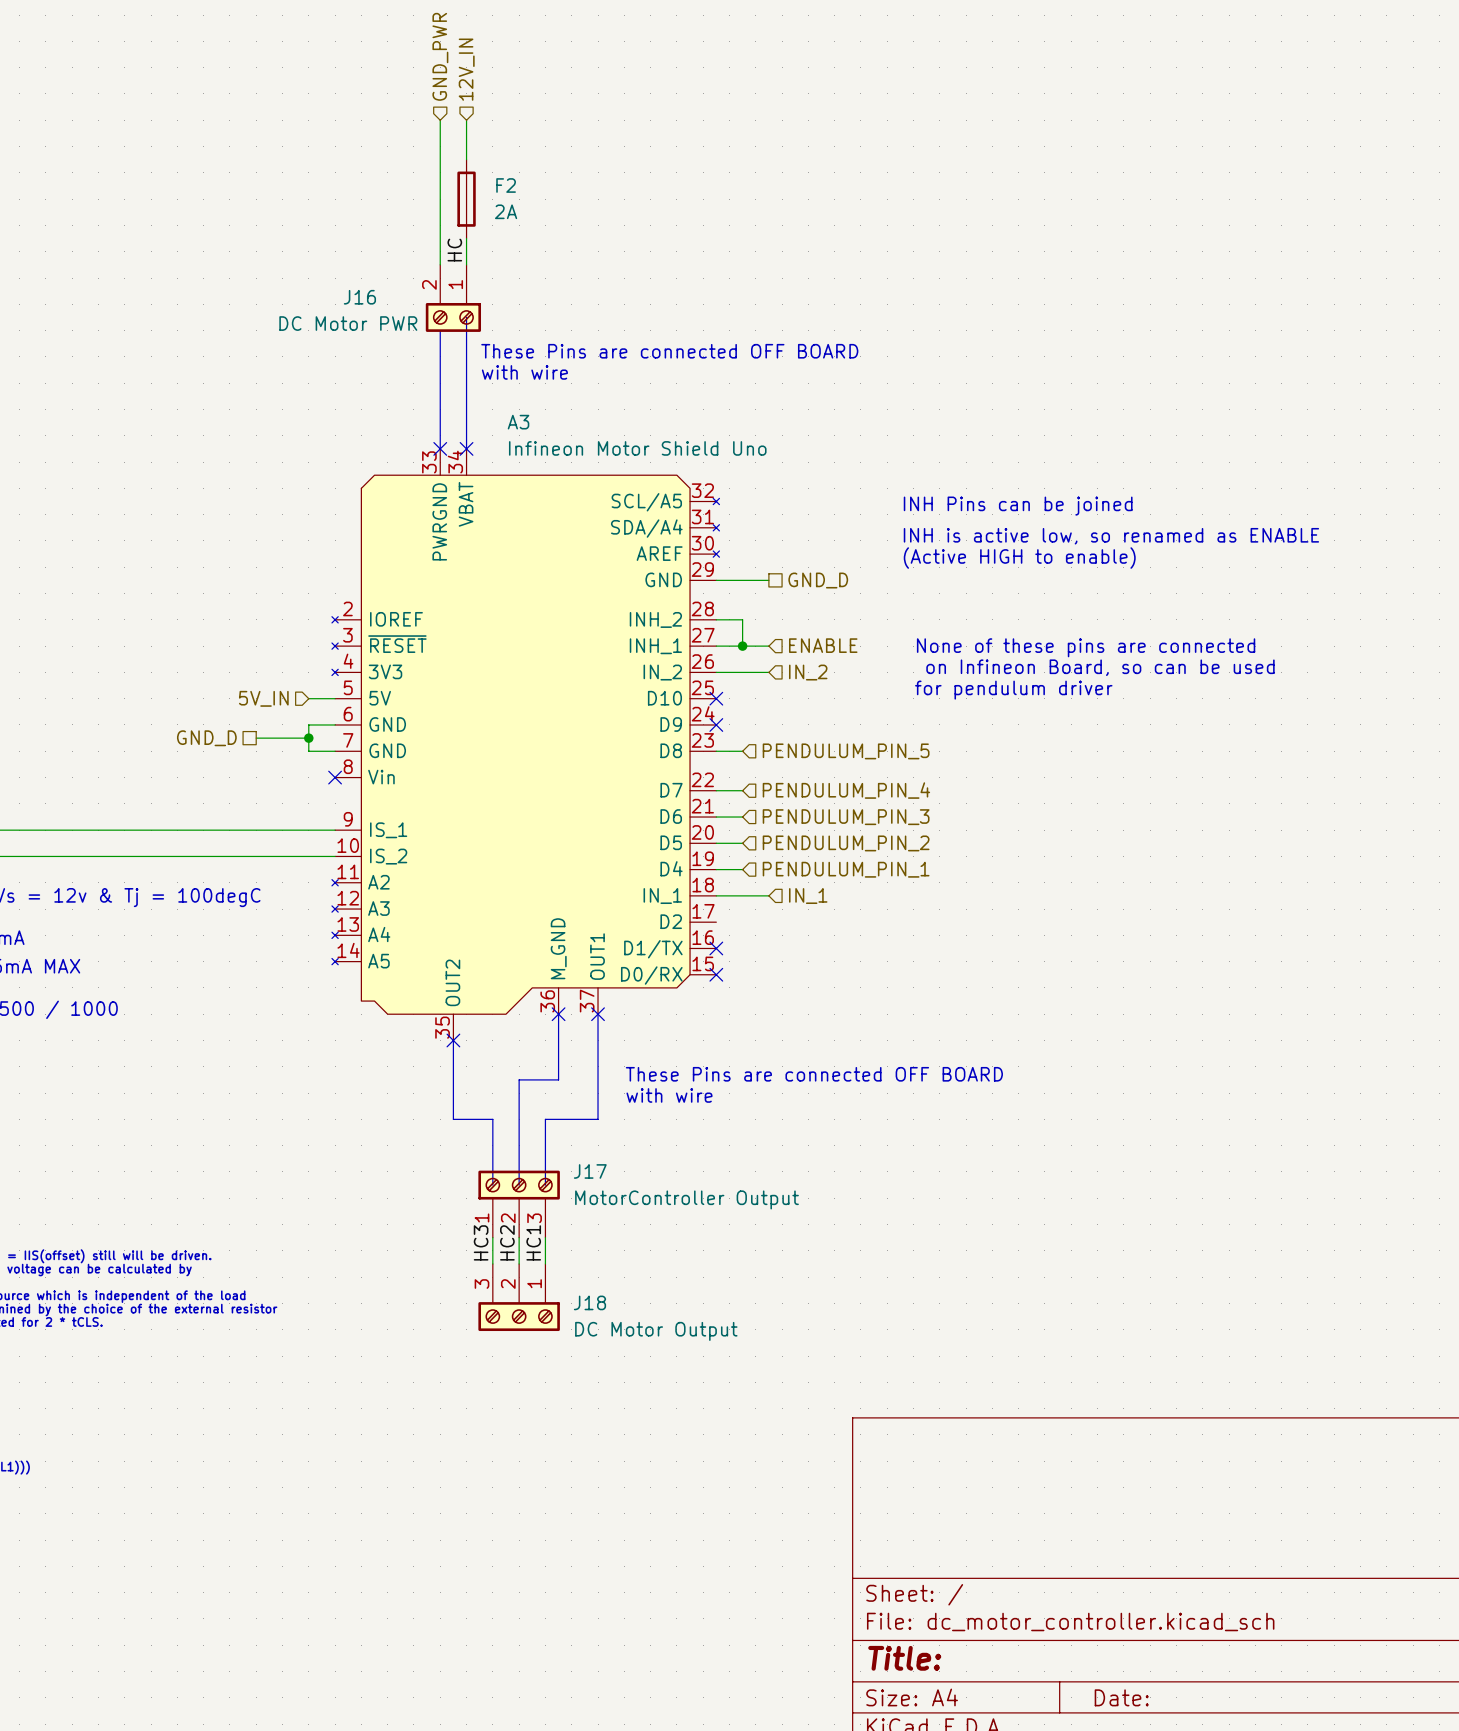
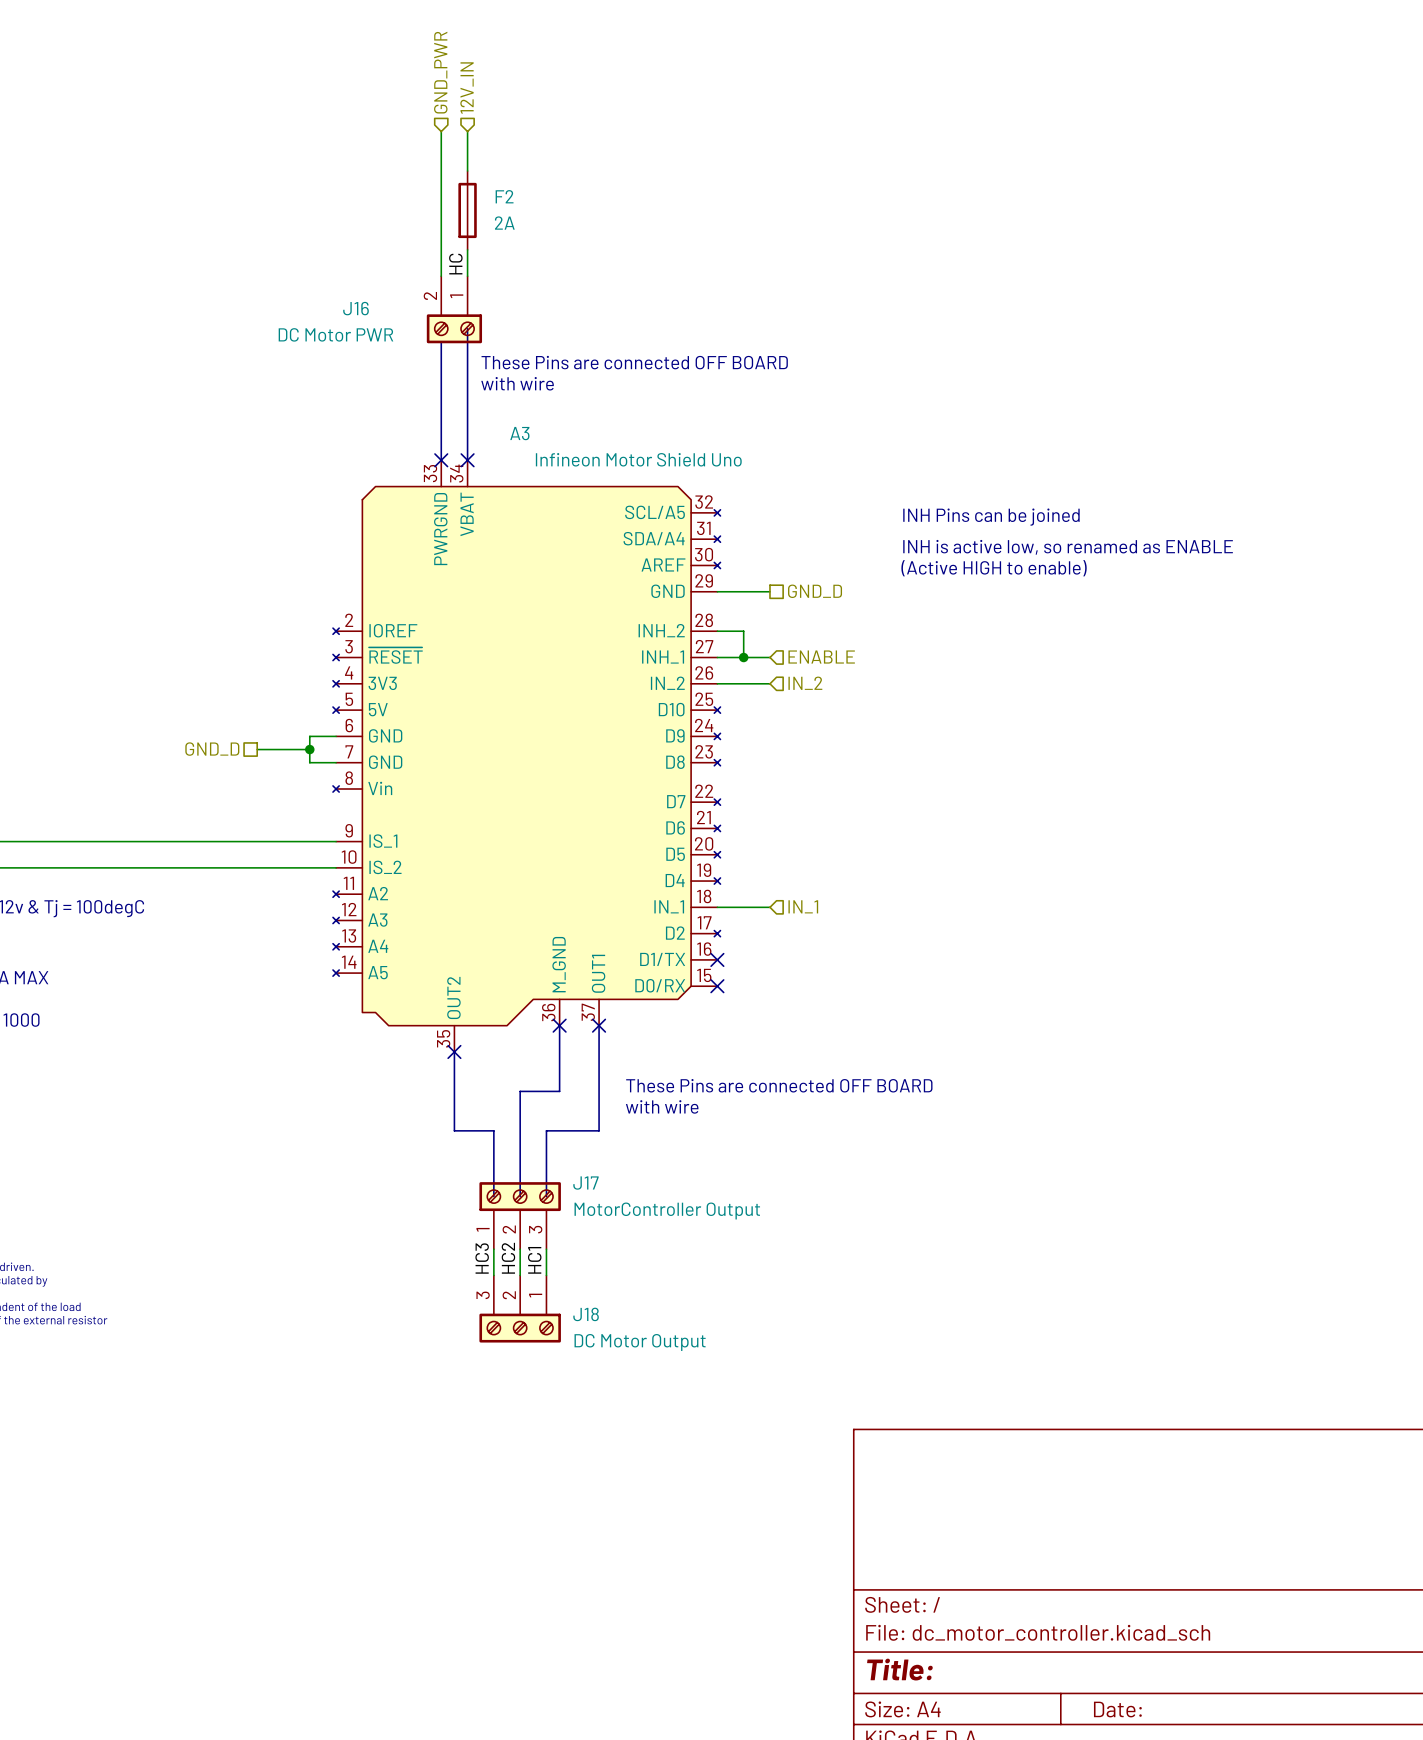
A3 symbol: [331, 448, 720, 1041] -> [332, 460, 721, 1052]
text: None of these pins are connected (1086, 647) -> none
text: on Infineon Board, so can be used (1100, 667) -> none
text: for pendulum driver (1013, 690) -> none
hierarchical label: 5V_IN (263, 698) -> none
wire: (308, 698) (335, 698) -> none
no-connect mark: (716, 698) -> none
no-connect mark: (716, 724) -> none
wire: (716, 751) (742, 751) -> none
hierarchical label: PENDULUM_PIN_5 (846, 751) -> none
no-connect mark: (335, 777) -> none
wire: (716, 790) (742, 790) -> none
hierarchical label: PENDULUM_PIN_4 (846, 790) -> none
wire: (716, 817) (742, 817) -> none
hierarchical label: PENDULUM_PIN_3 (846, 817) -> none
wire: (716, 843) (742, 843) -> none
hierarchical label: PENDULUM_PIN_2 (846, 843) -> none
wire: (716, 869) (742, 869) -> none
hierarchical label: PENDULUM_PIN_1 (846, 869) -> none

